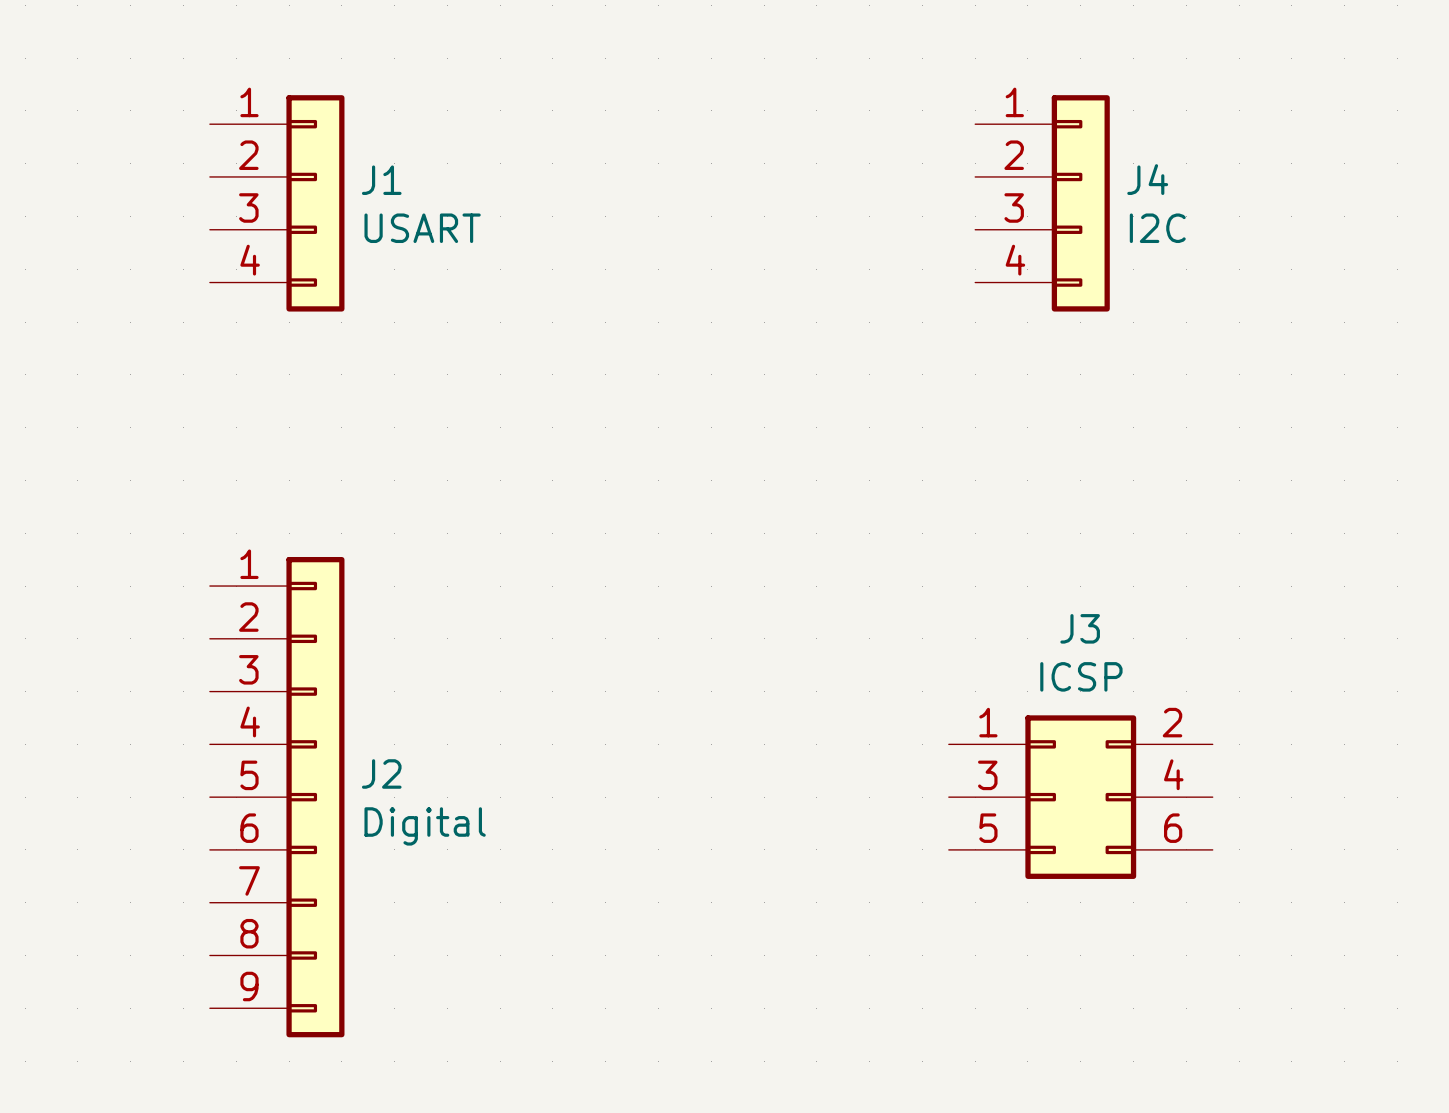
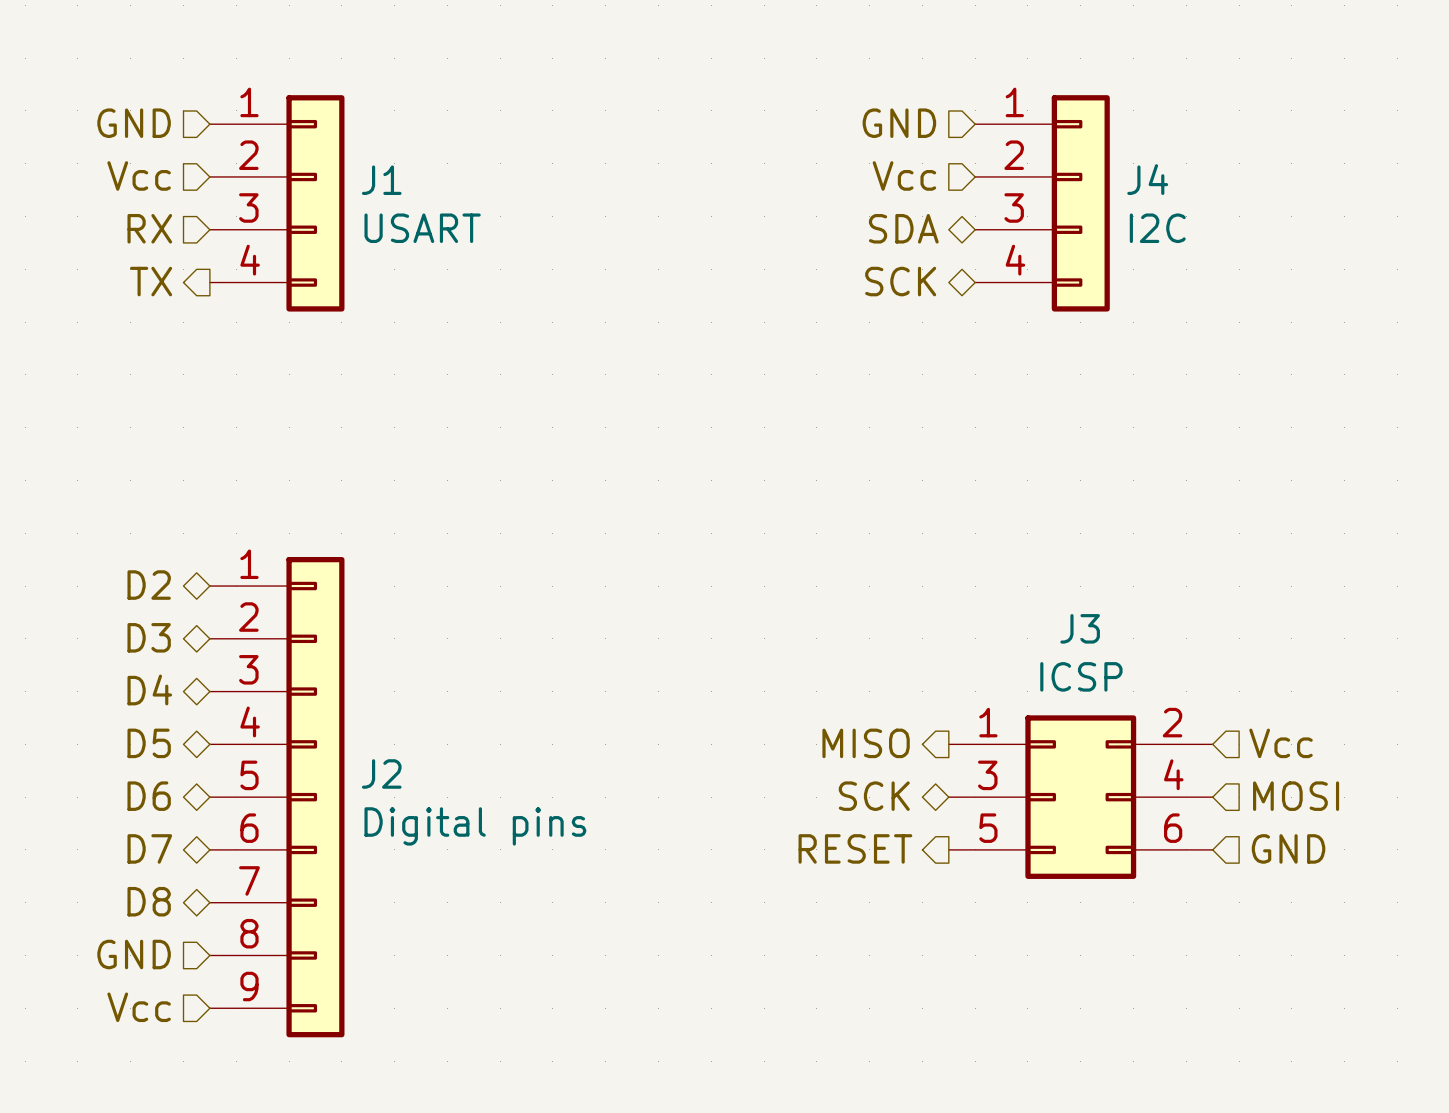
hierarchical label: none -> GND (134, 123)
hierarchical label: none -> GND (899, 123)
hierarchical label: none -> Vcc (139, 175)
hierarchical label: none -> Vcc (904, 175)
hierarchical label: none -> RX (149, 228)
hierarchical label: none -> SDA (903, 228)
hierarchical label: none -> TX (151, 281)
hierarchical label: none -> SCK (900, 281)
hierarchical label: none -> D2 (149, 585)
hierarchical label: none -> D3 (149, 637)
hierarchical label: none -> D4 (149, 689)
hierarchical label: none -> D5 (149, 743)
hierarchical label: none -> MISO (866, 743)
hierarchical label: none -> Vcc (1281, 743)
hierarchical label: none -> D6 (149, 796)
hierarchical label: none -> SCK (874, 796)
hierarchical label: none -> MOSI (1296, 796)
J2 value: Digital (425, 826) -> Digital pins (475, 826)
hierarchical label: none -> D7 (149, 848)
hierarchical label: none -> RESET (855, 848)
hierarchical label: none -> GND (1288, 848)
hierarchical label: none -> D8 (149, 901)
hierarchical label: none -> GND (134, 954)
hierarchical label: none -> Vcc (139, 1007)

